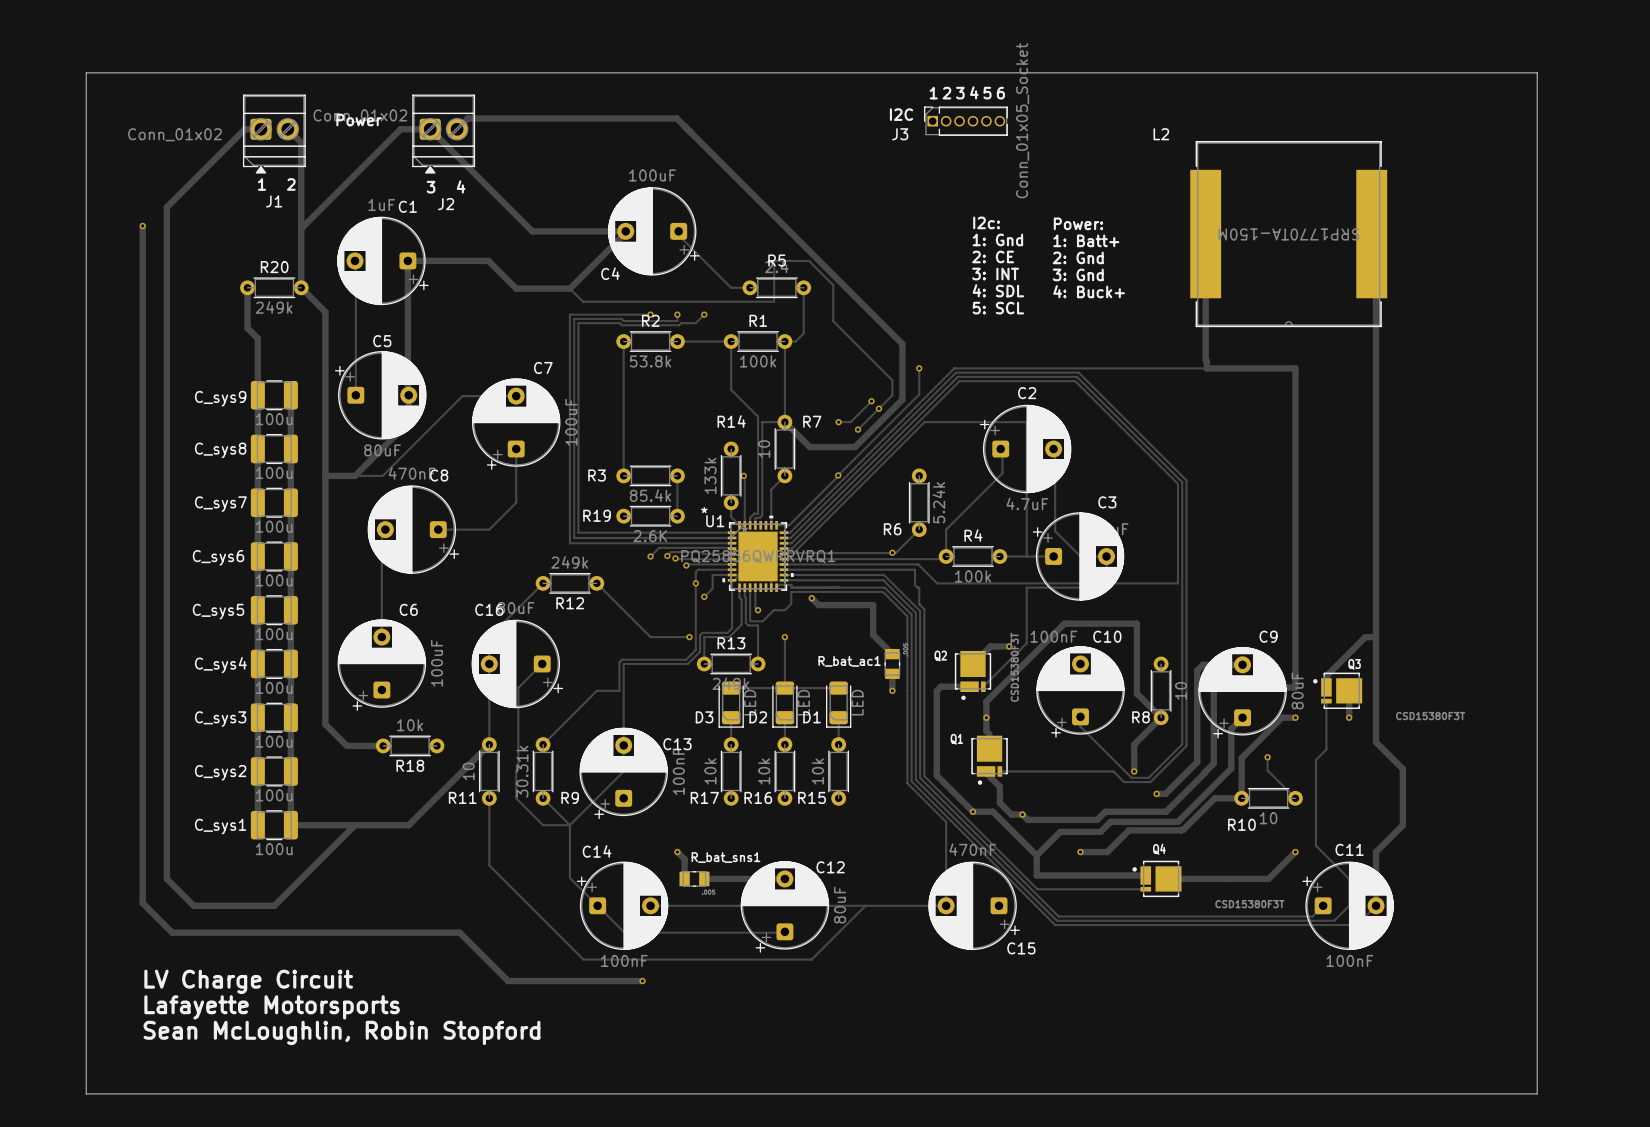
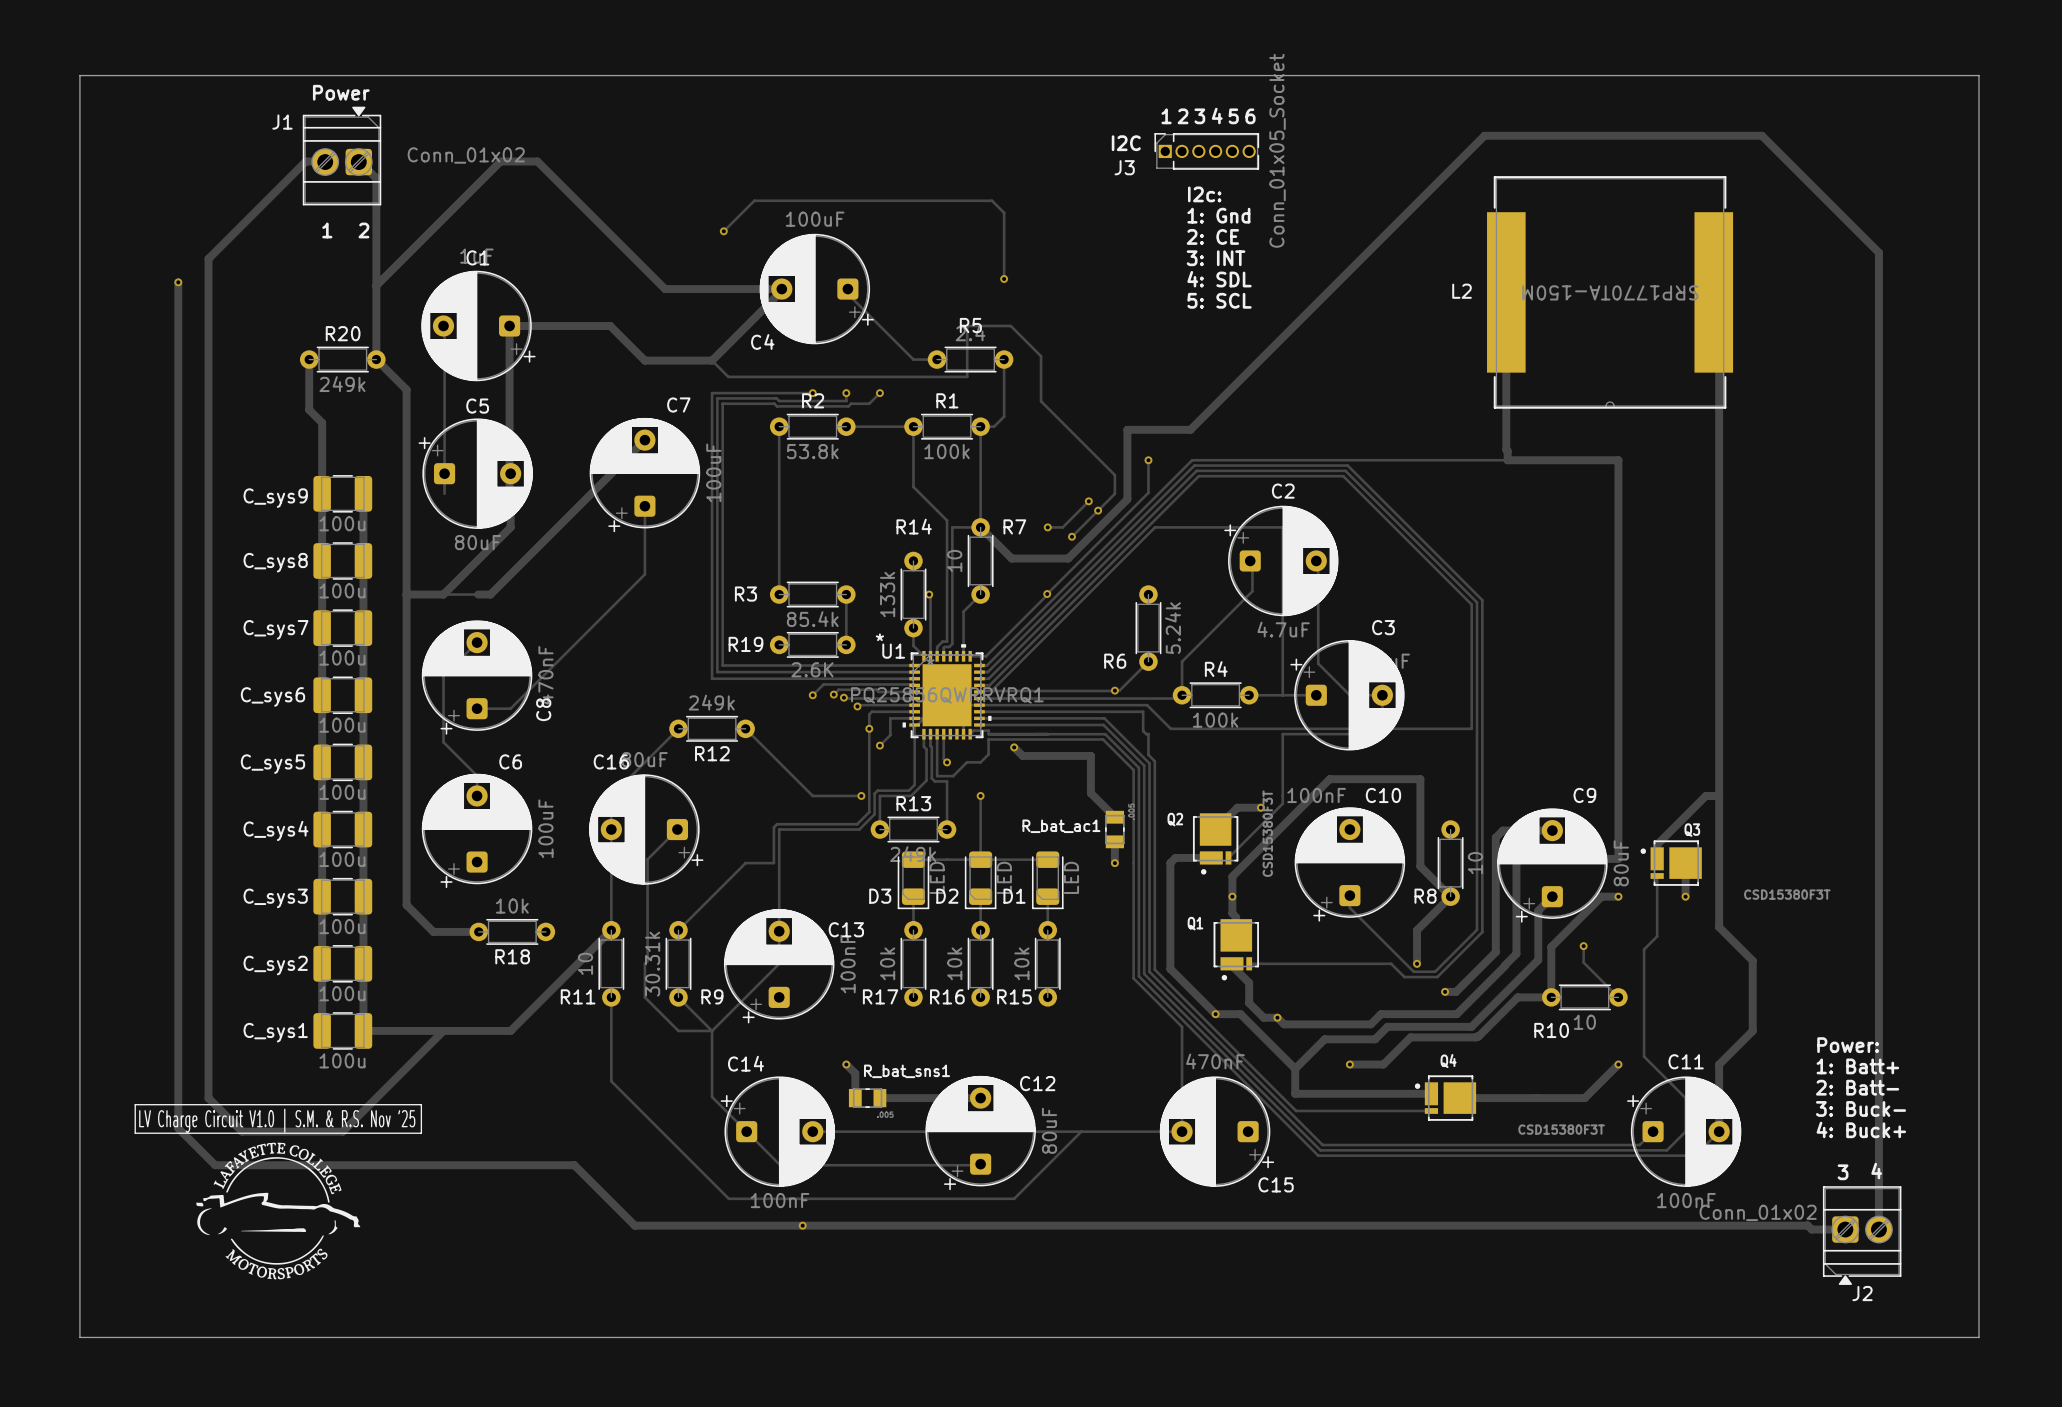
board edge: (86, 72) (1537, 72) (1537, 1093) (86, 1093) (86, 72) -> (79, 75) (79, 1337) (1978, 1337) (1978, 75) (79, 75)
text position: Power (359, 119) -> Power (341, 92)
track: (457, 129) (467, 118) (676, 118) (902, 344) -> (1878, 1229) (1878, 252) (1761, 135) (1484, 135) (1190, 429) (1127, 429)
J1 rotation: 0° (274, 134) -> 180° (342, 156)
J2 position: (443, 134) -> (1862, 1235)
L2 name position: L2 (1161, 134) -> L2 (1462, 291)
track: none -> (723, 231) (754, 200) (992, 200) (1004, 212) (1004, 278)
via: none -> (723, 231)
text: 4 (461, 186) -> none
text: 3 (431, 187) -> none
J1 name position: J1 (274, 201) -> J1 (282, 122)
J2 name position: J2 (446, 204) -> J2 (1862, 1293)
C1 name position: C1 (407, 206) -> C1 (477, 257)
text position: I2c: (986, 222) -> I2c: (1204, 194)
via: none -> (1004, 278)
text: Power: (1078, 223) -> none
text position: 1: Gnd (997, 239) -> 1: Gnd (1218, 215)
text: 1: Batt+ (1086, 240) -> none
text position: 2: CE (993, 256) -> 2: CE (1212, 236)
text: 2: Gnd (1078, 257) -> none
text position: 3: INT (995, 274) -> 3: INT (1216, 258)
text: 3: Gnd (1078, 274) -> none
text position: 4: SDL (998, 290) -> 4: SDL (1219, 279)
text: 4: Buck+ (1089, 291) -> none
text position: 5: SCL (998, 308) -> 5: SCL (1219, 300)
C5 position: (380, 395) -> (475, 473)
track: (516, 396) (462, 396) (382, 475) -> (644, 440) (490, 594) (478, 594)
track: none -> (644, 506) (644, 560)
C7 position: (516, 424) -> (644, 475)
track: (516, 459) (516, 502) (489, 529) (438, 529) -> (644, 574) (510, 708) (477, 708)
track: (385, 529) (381, 533) (381, 620) -> (477, 642) (443, 676) (443, 742) (477, 775)
C8 rotation: 0° (413, 529) -> 90° clockwise (477, 677)
text: none -> Power: (1848, 1045)
text: none -> 1: Batt+ (1857, 1066)
text: none -> 2: Batt- (1857, 1087)
line: none -> (135, 1104) (421, 1104) (421, 1133) (135, 1133) (135, 1104)
text: none -> 3: Buck- (1861, 1108)
text: none -> LV Charge Circuit V1.0 | S.M. & R.S. Nov '25 (277, 1120)
text: none -> 4: Buck+ (1861, 1129)
drawing: none -> [196, 1142, 361, 1280]
text: none -> 4 (1876, 1171)
text: none -> 3 (1843, 1172)
text: LV Charge Circuit (248, 981) -> none
track: none -> (802, 1225) (1807, 1225) (1811, 1229) (1845, 1229)
text: Lafayette Motorsports (272, 1007) -> none
text: Sean McLoughlin, Robin Stopford (341, 1032) -> none

